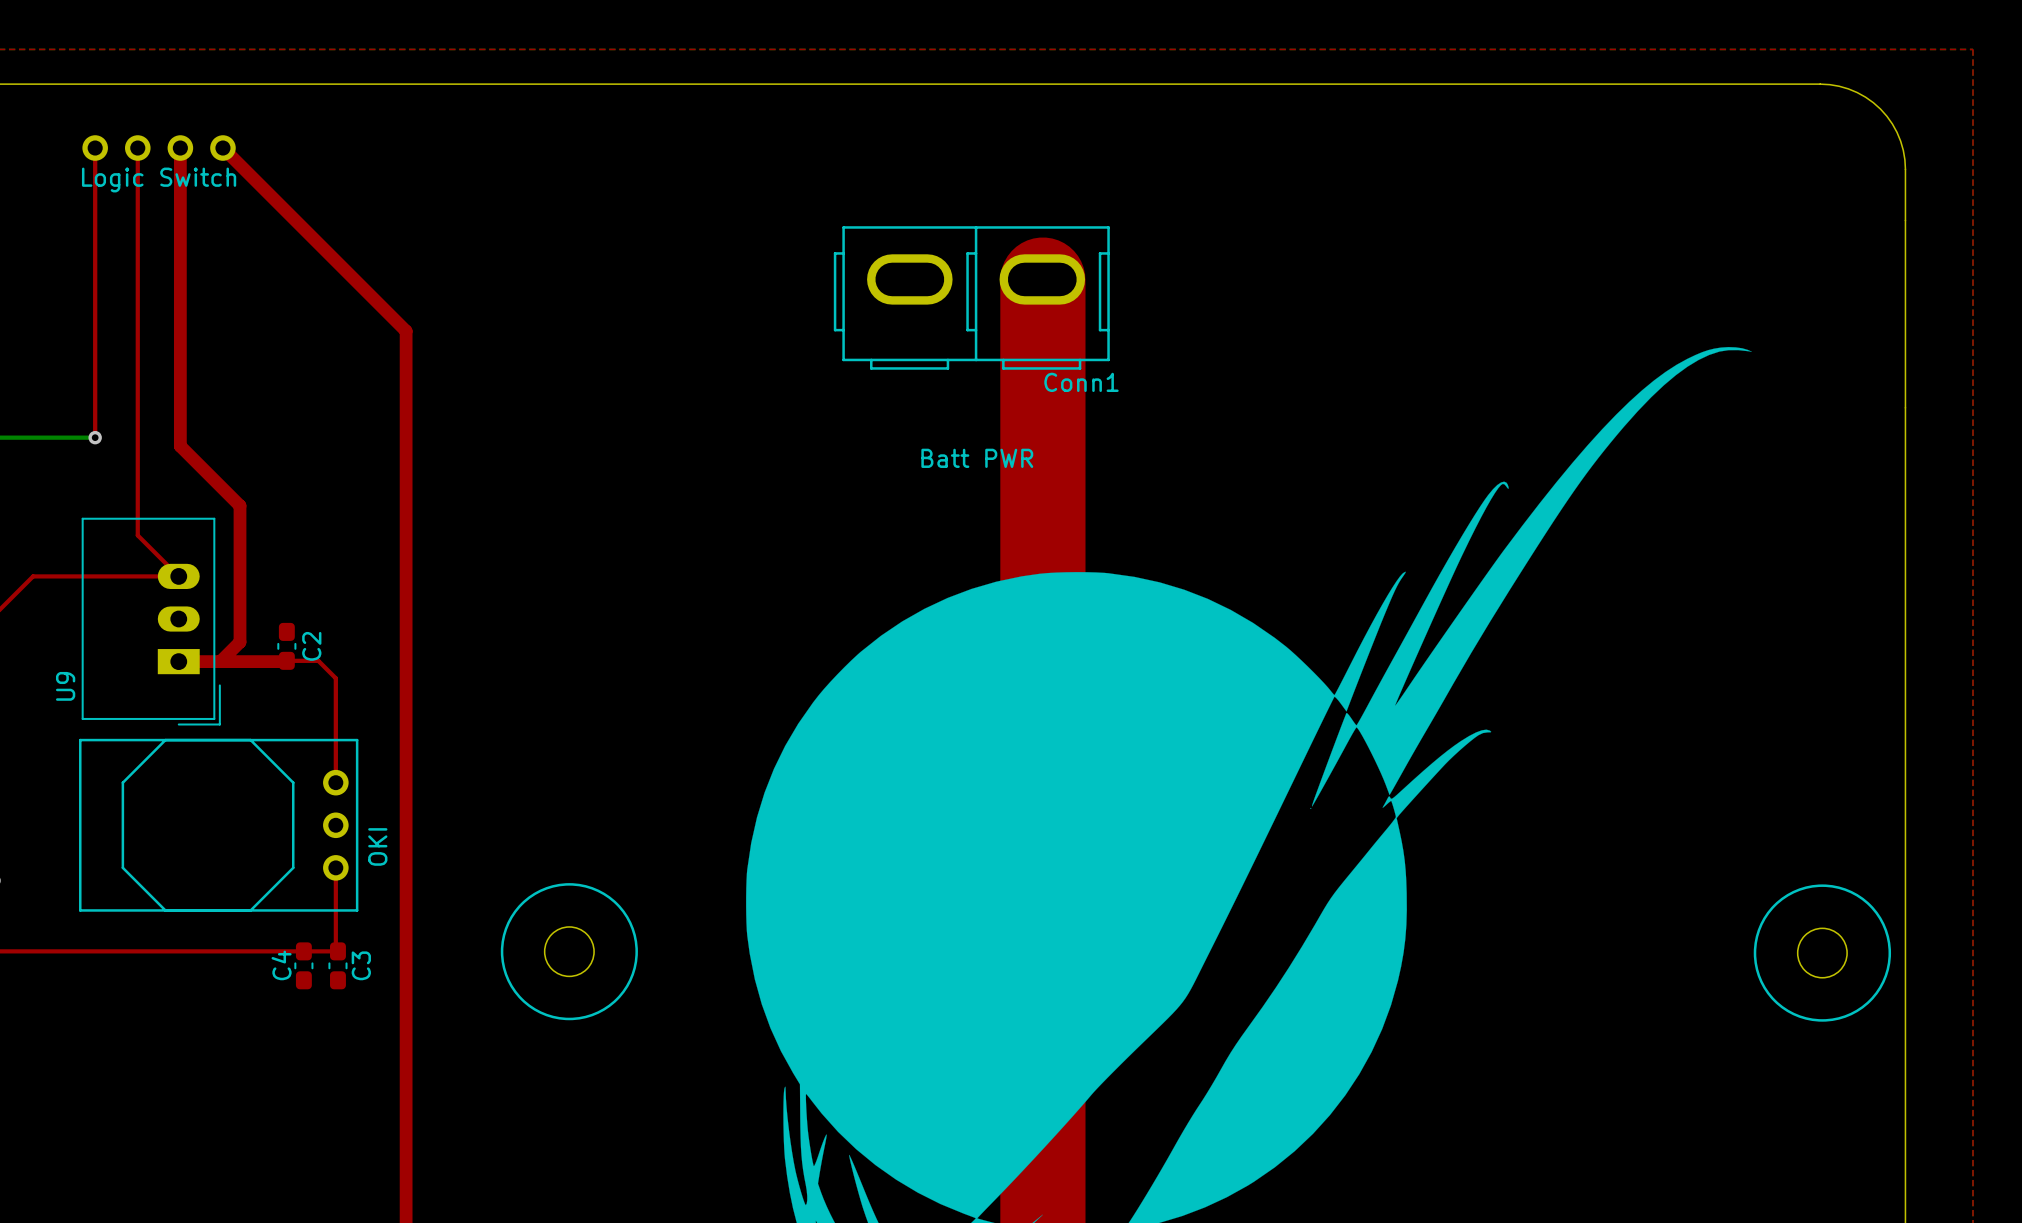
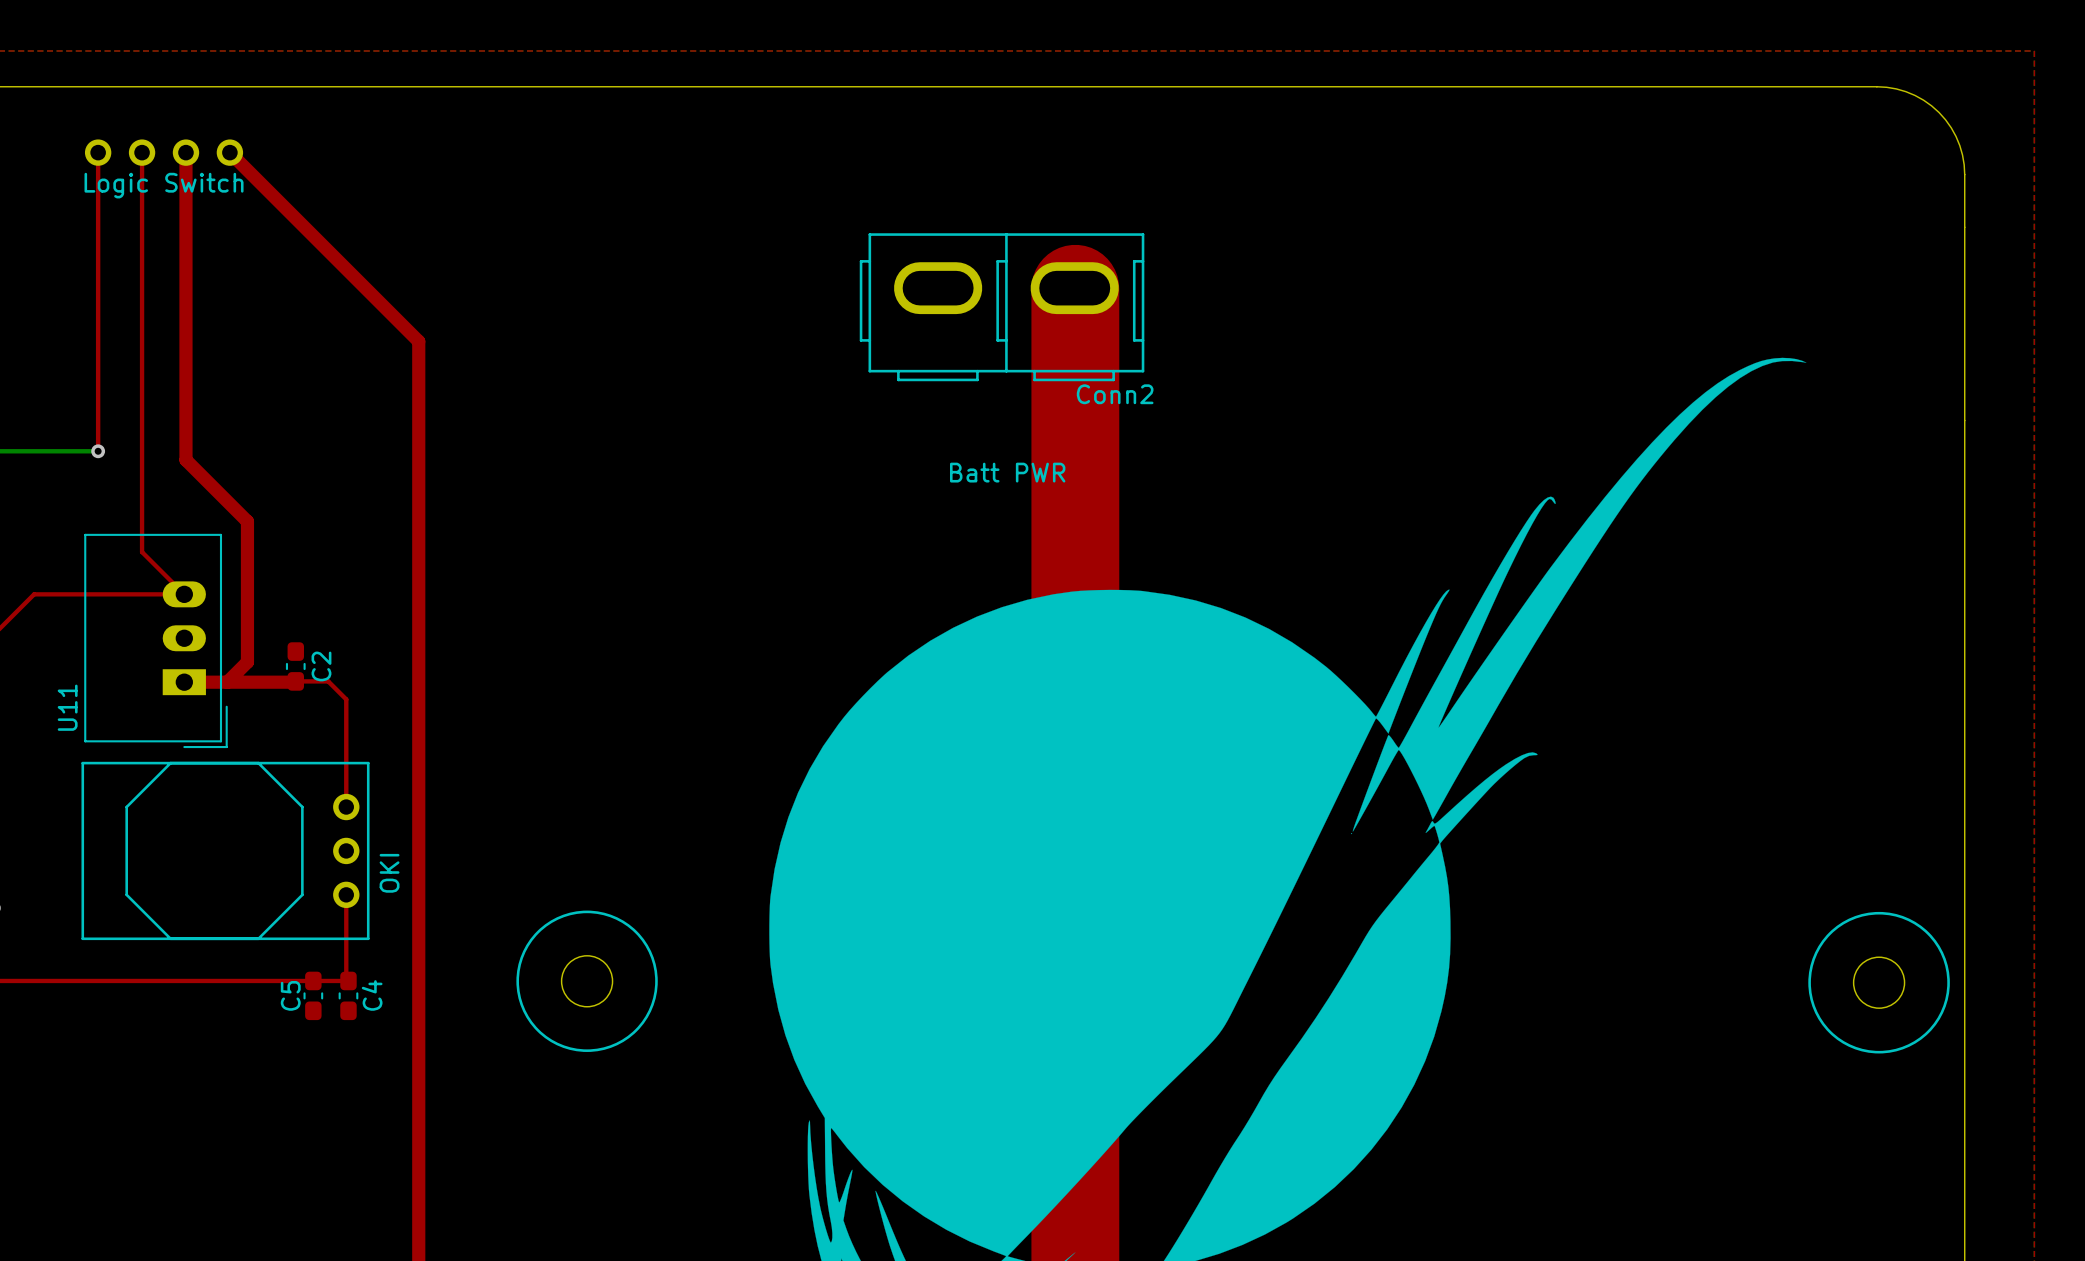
Conn1 name: Conn1 (1081, 382) -> Conn2 (1115, 394)
U9 name: U9 (65, 686) -> U11 (67, 707)
C4 name: C4 (281, 965) -> C5 (290, 995)
C3 name: C3 (361, 965) -> C4 (372, 995)

